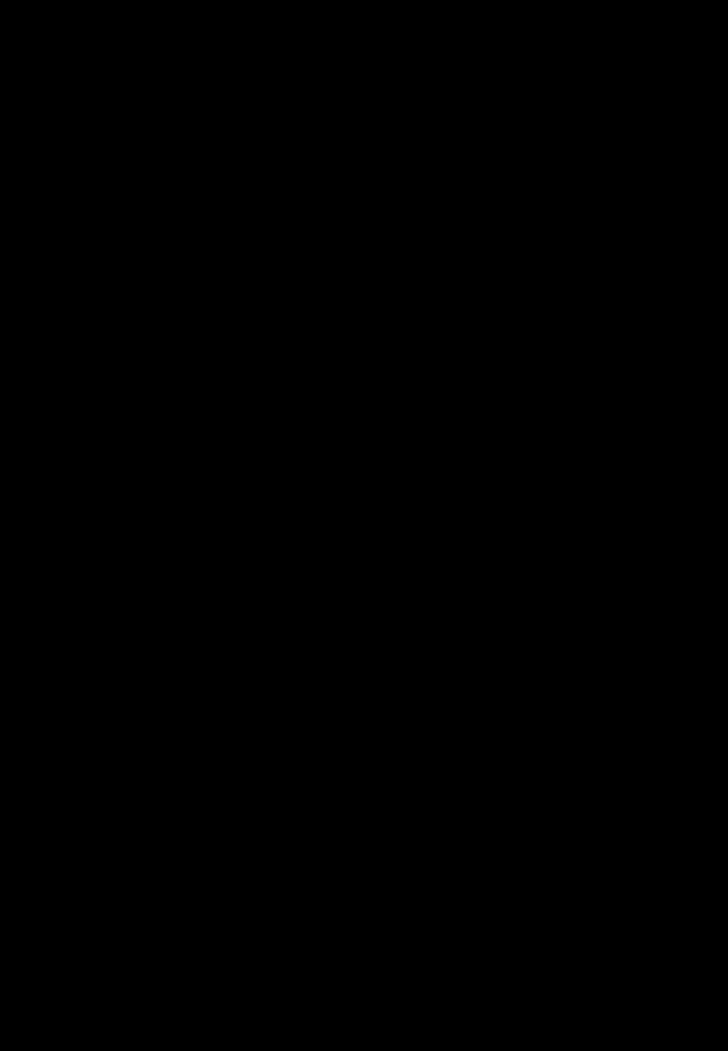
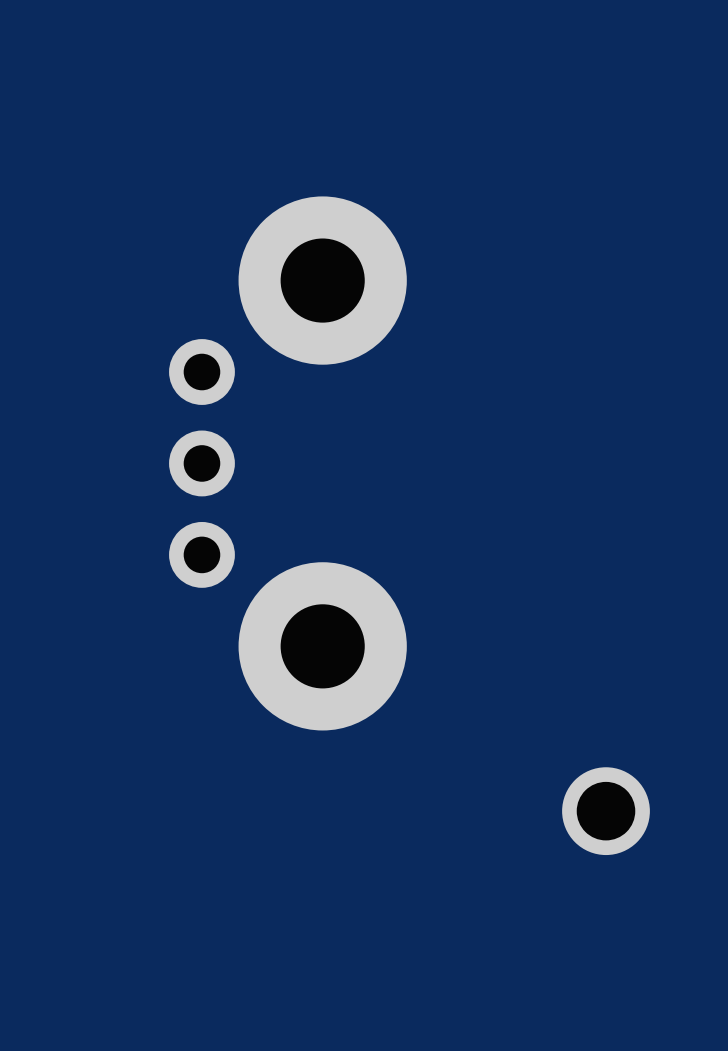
part: none -> (287, 463)
part: none -> (606, 811)

